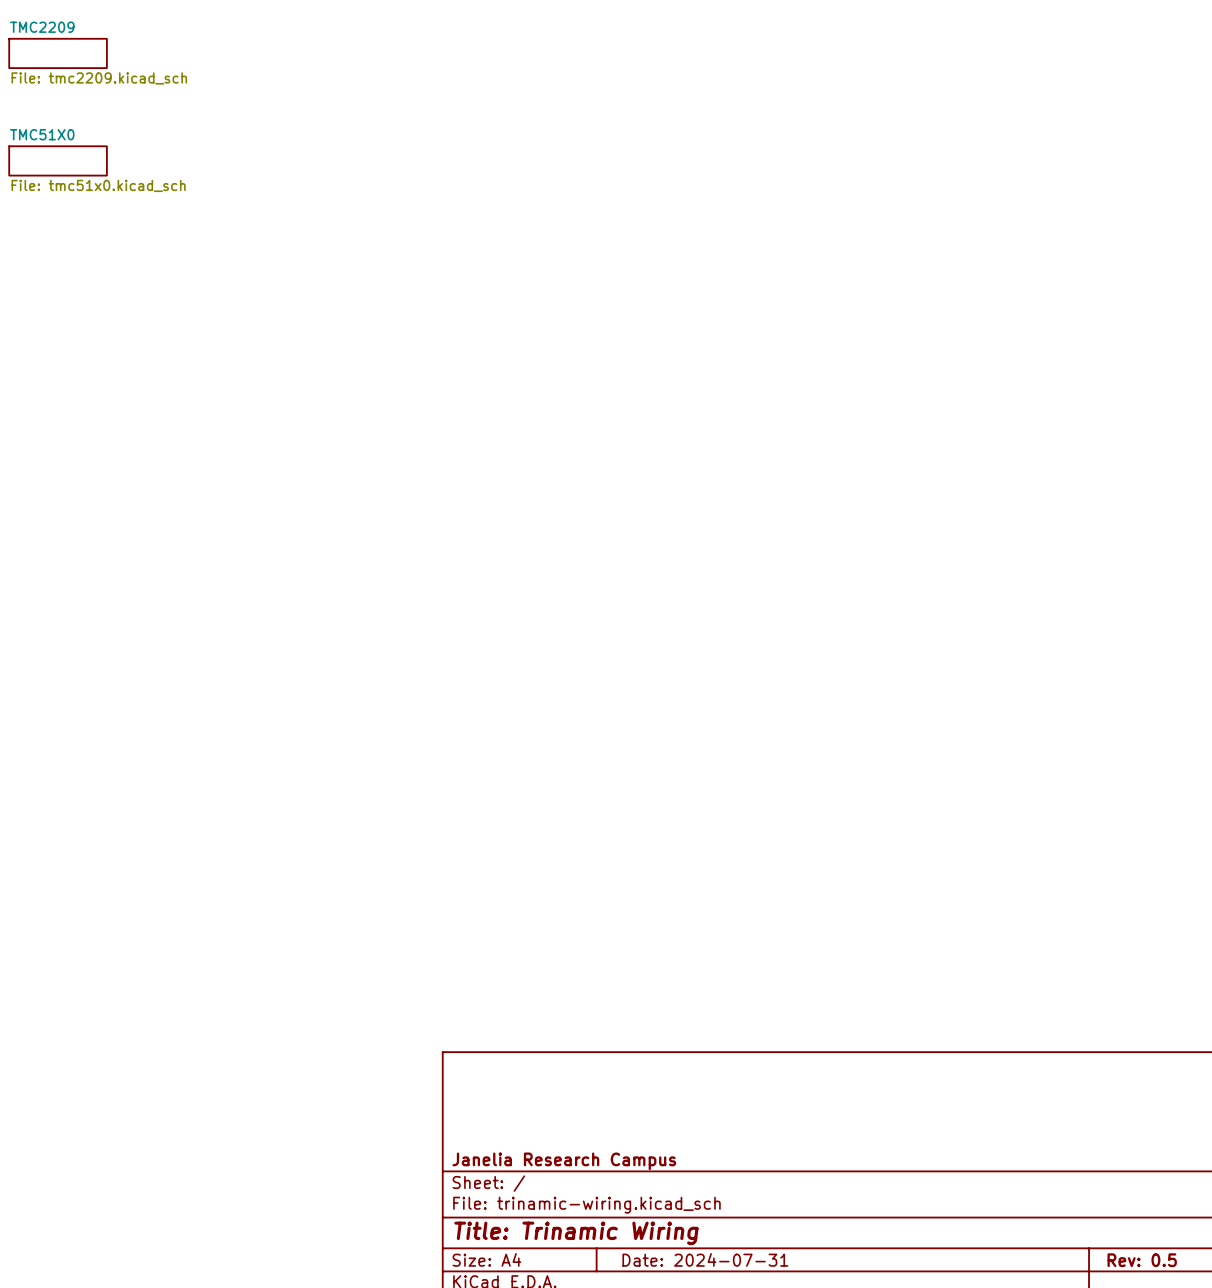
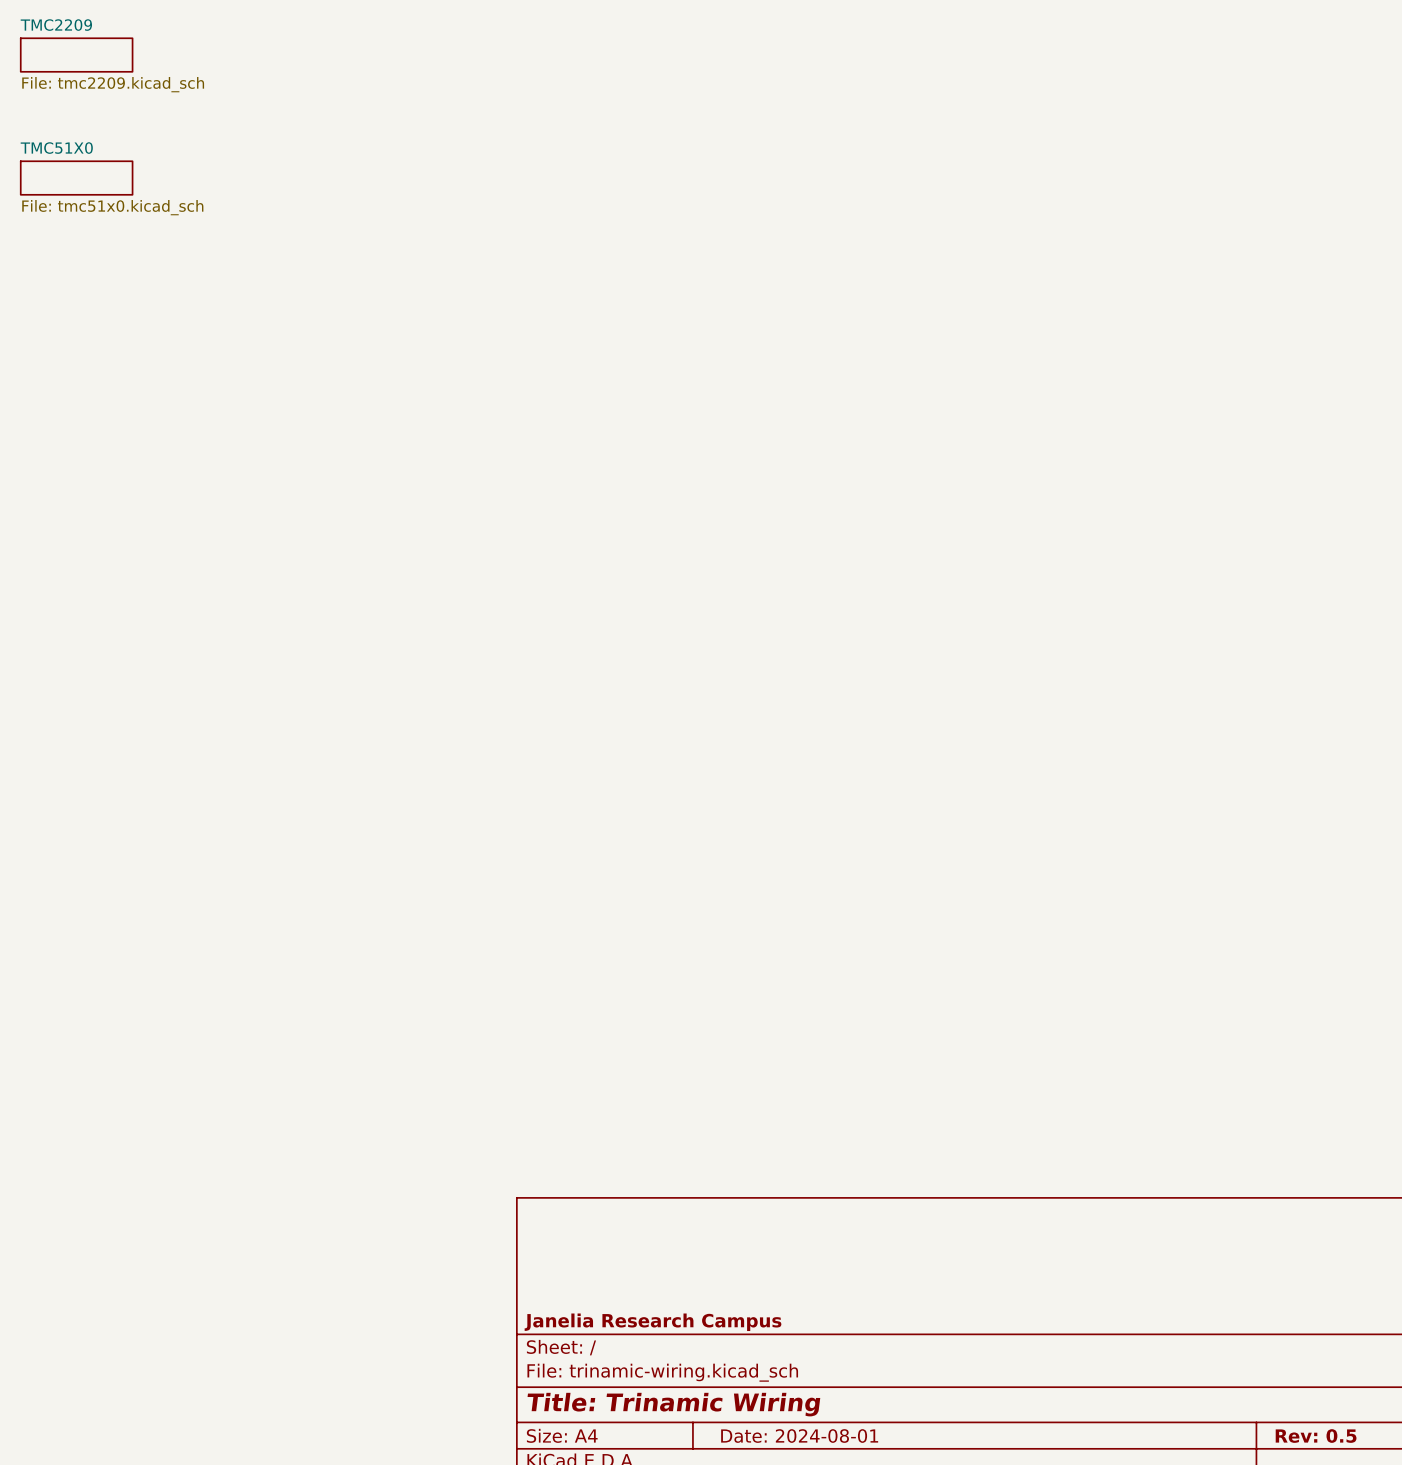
title block: Date: 2024-07-31 (705, 1259) -> Date: 2024-08-01 (799, 1436)

